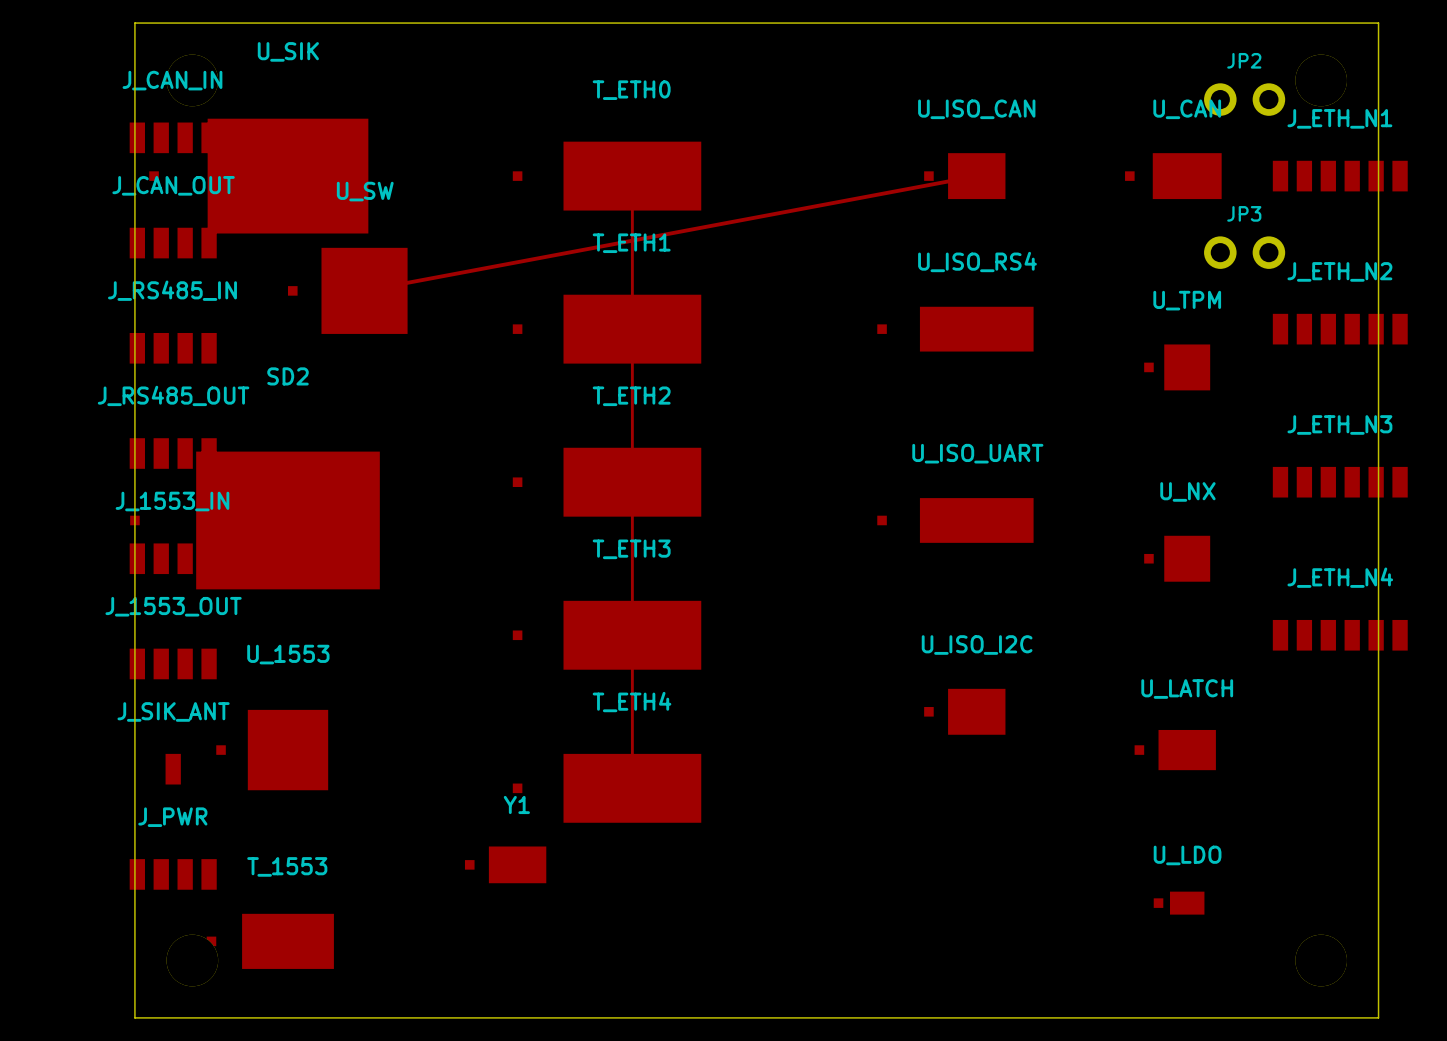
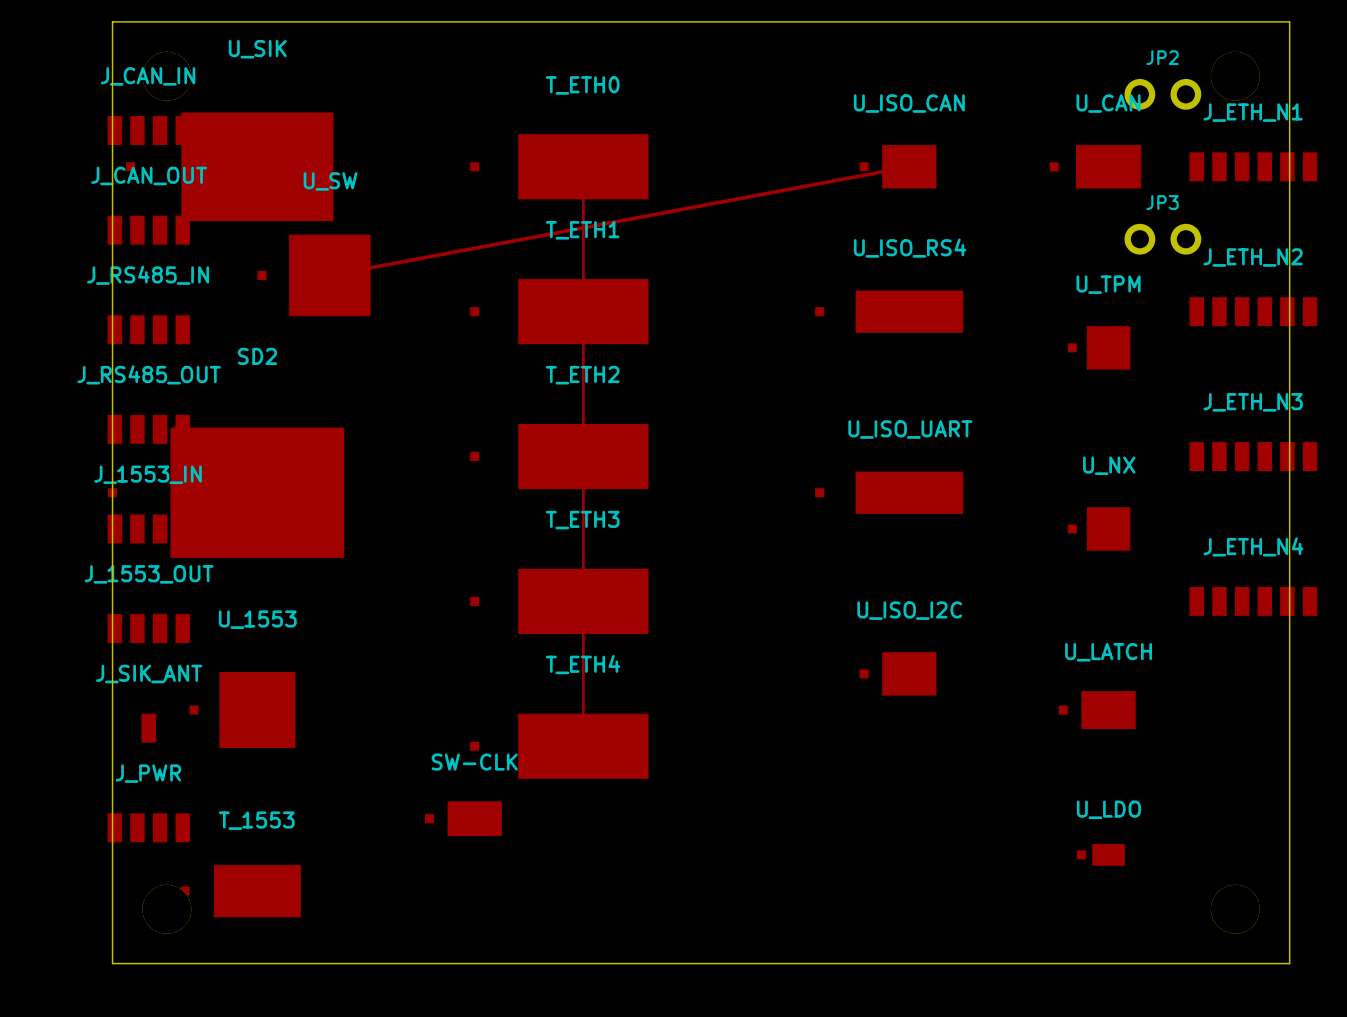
Y1 name: Y1 (516, 804) -> SW-CLK (474, 762)

